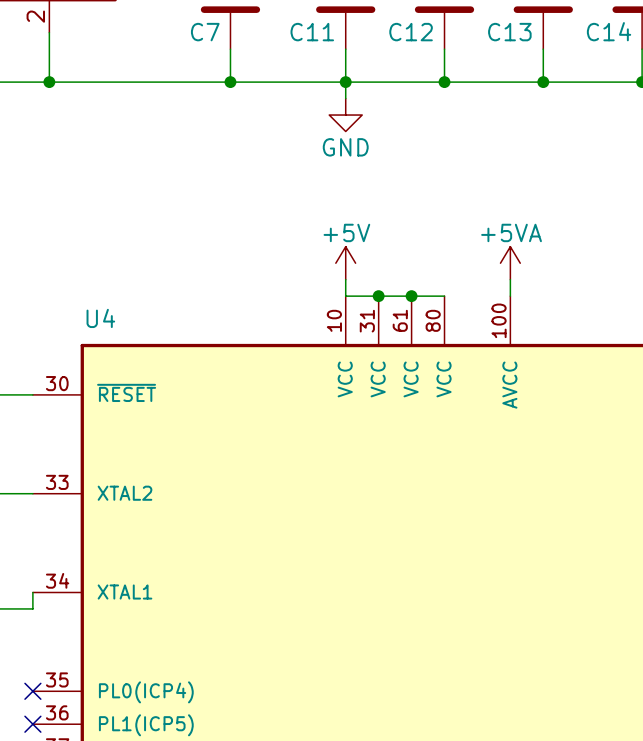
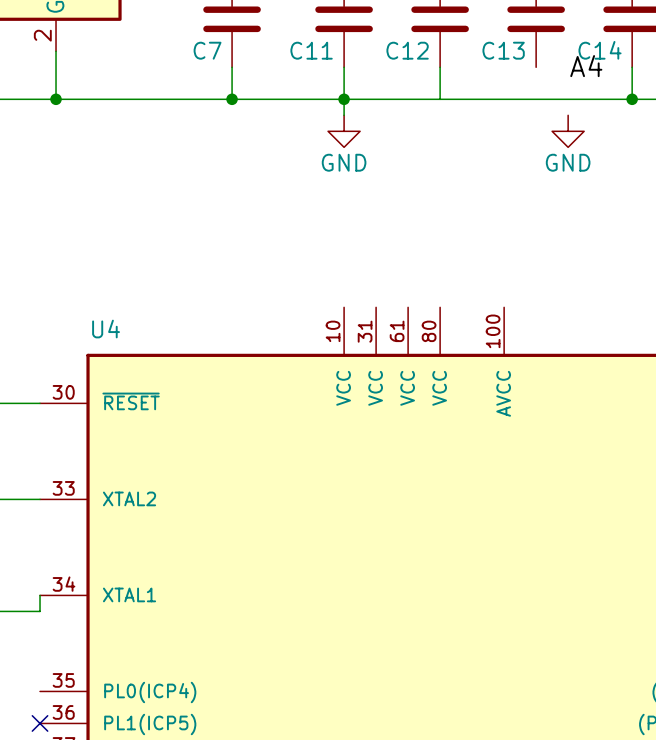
label: none -> A4 (586, 66)
wire: (543, 49) (543, 82) -> none
junction: (444, 82) -> none
junction: (543, 82) -> none
power symbol: none -> GND (568, 131)
power symbol: +5V (345, 263) -> none
power symbol: +5VA (510, 263) -> none
wire: (345, 279) (345, 296) (444, 296) -> none
wire: (510, 279) (510, 296) -> none
junction: (378, 296) -> none
junction: (411, 296) -> none
no-connect mark: (32, 691) -> none

